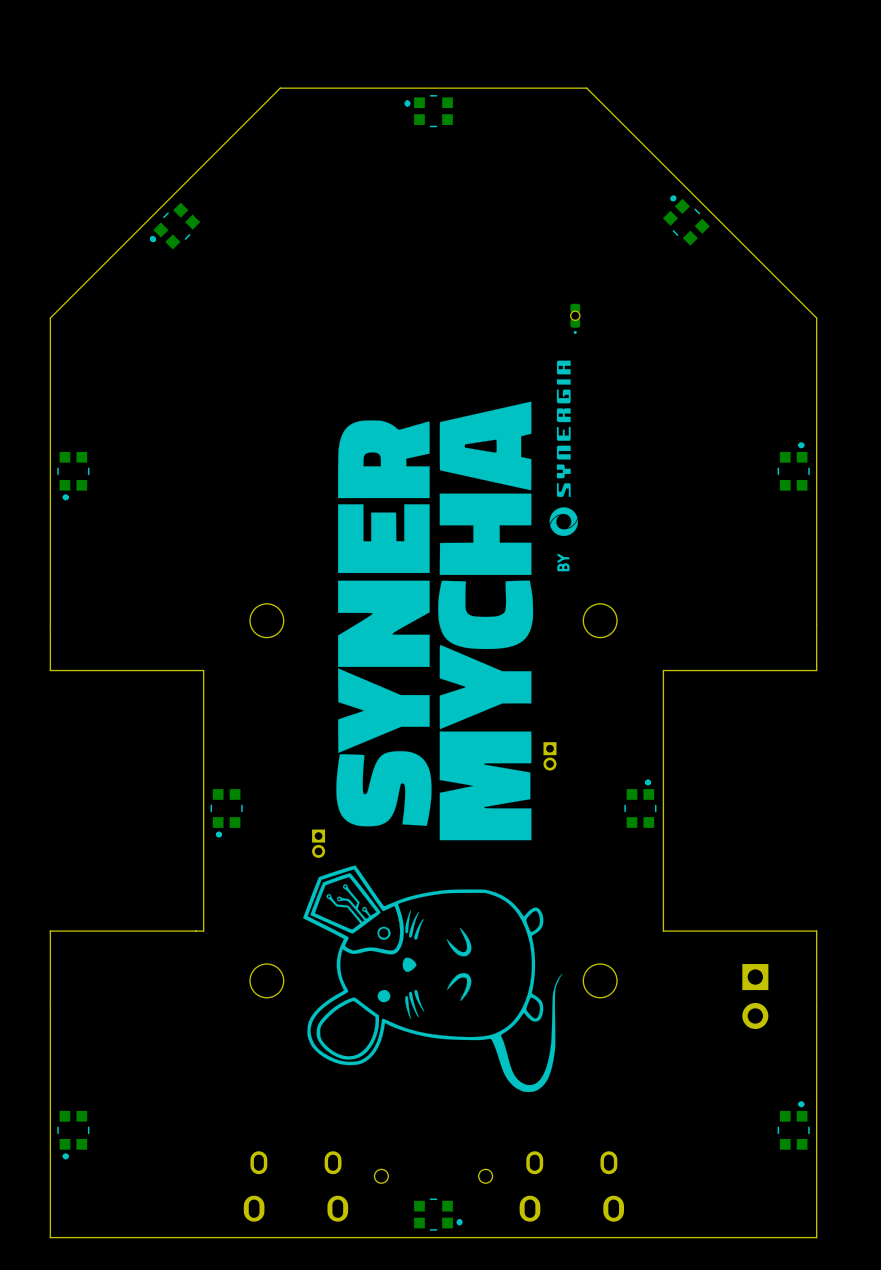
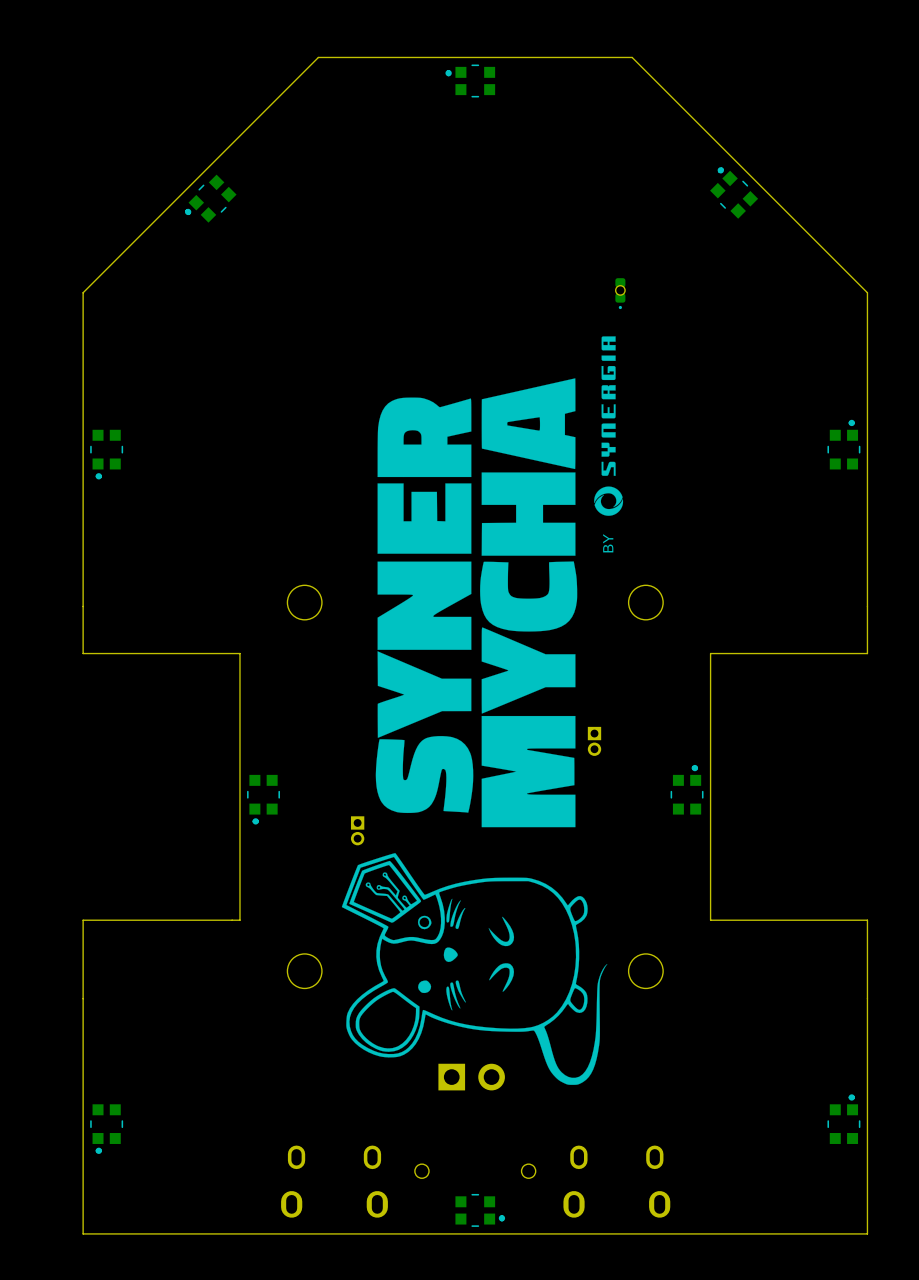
part rotation: 0° (755, 996) -> 90° counterclockwise (471, 1077)
part position: (755, 996) -> (471, 1077)

